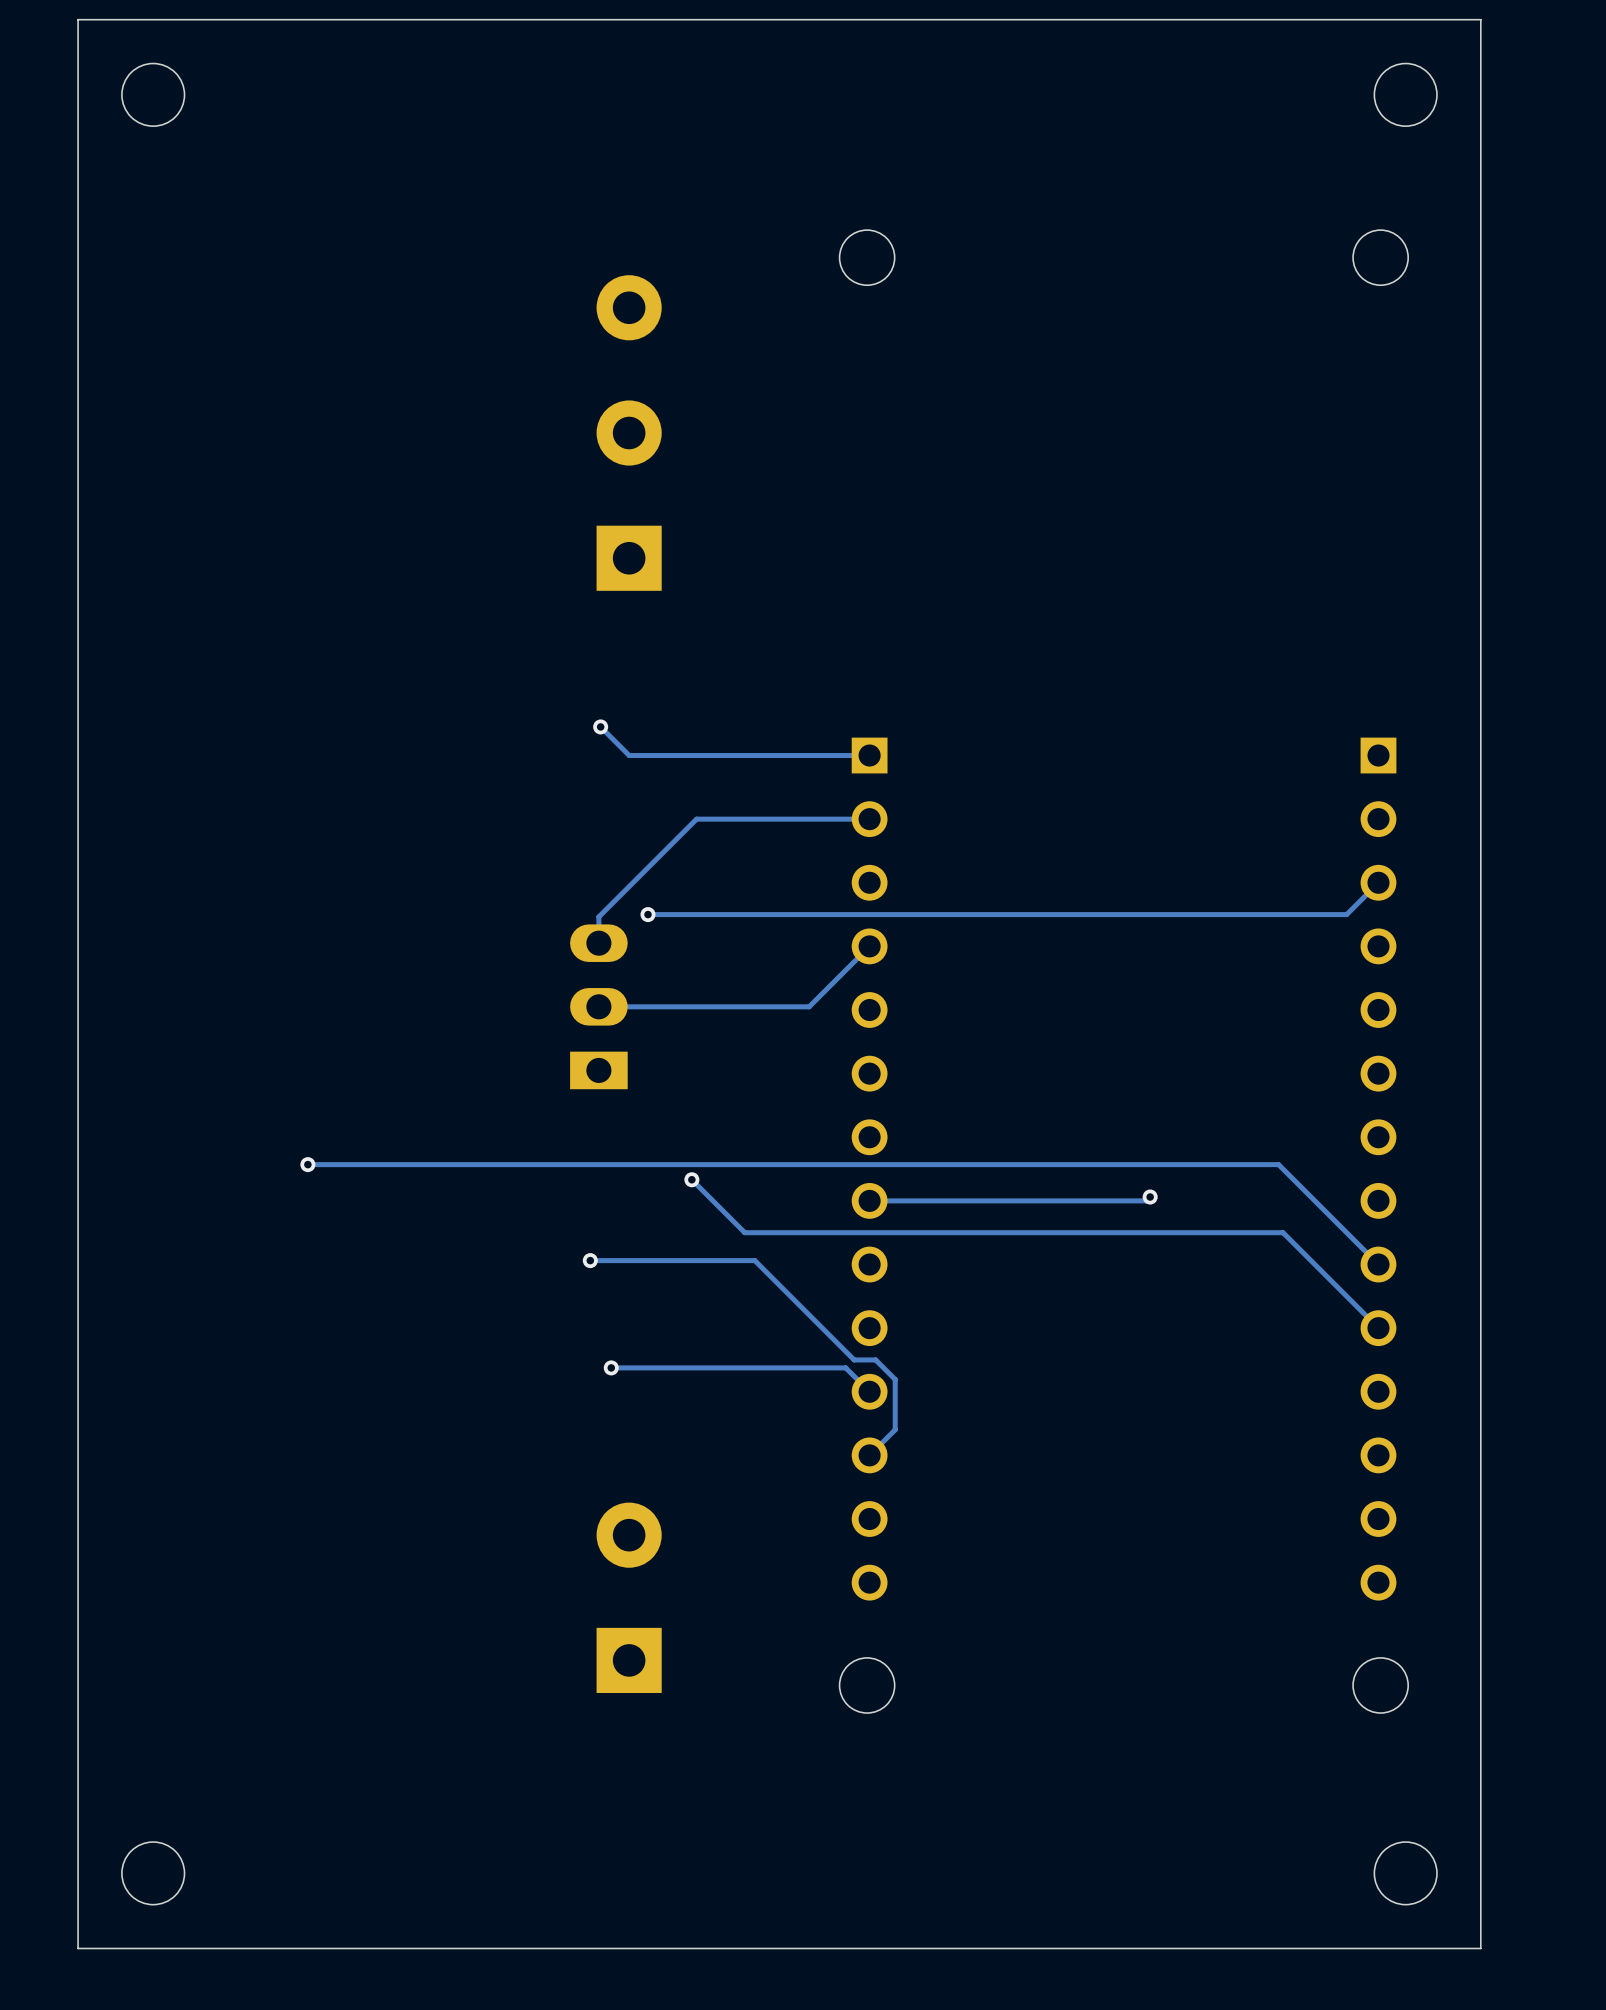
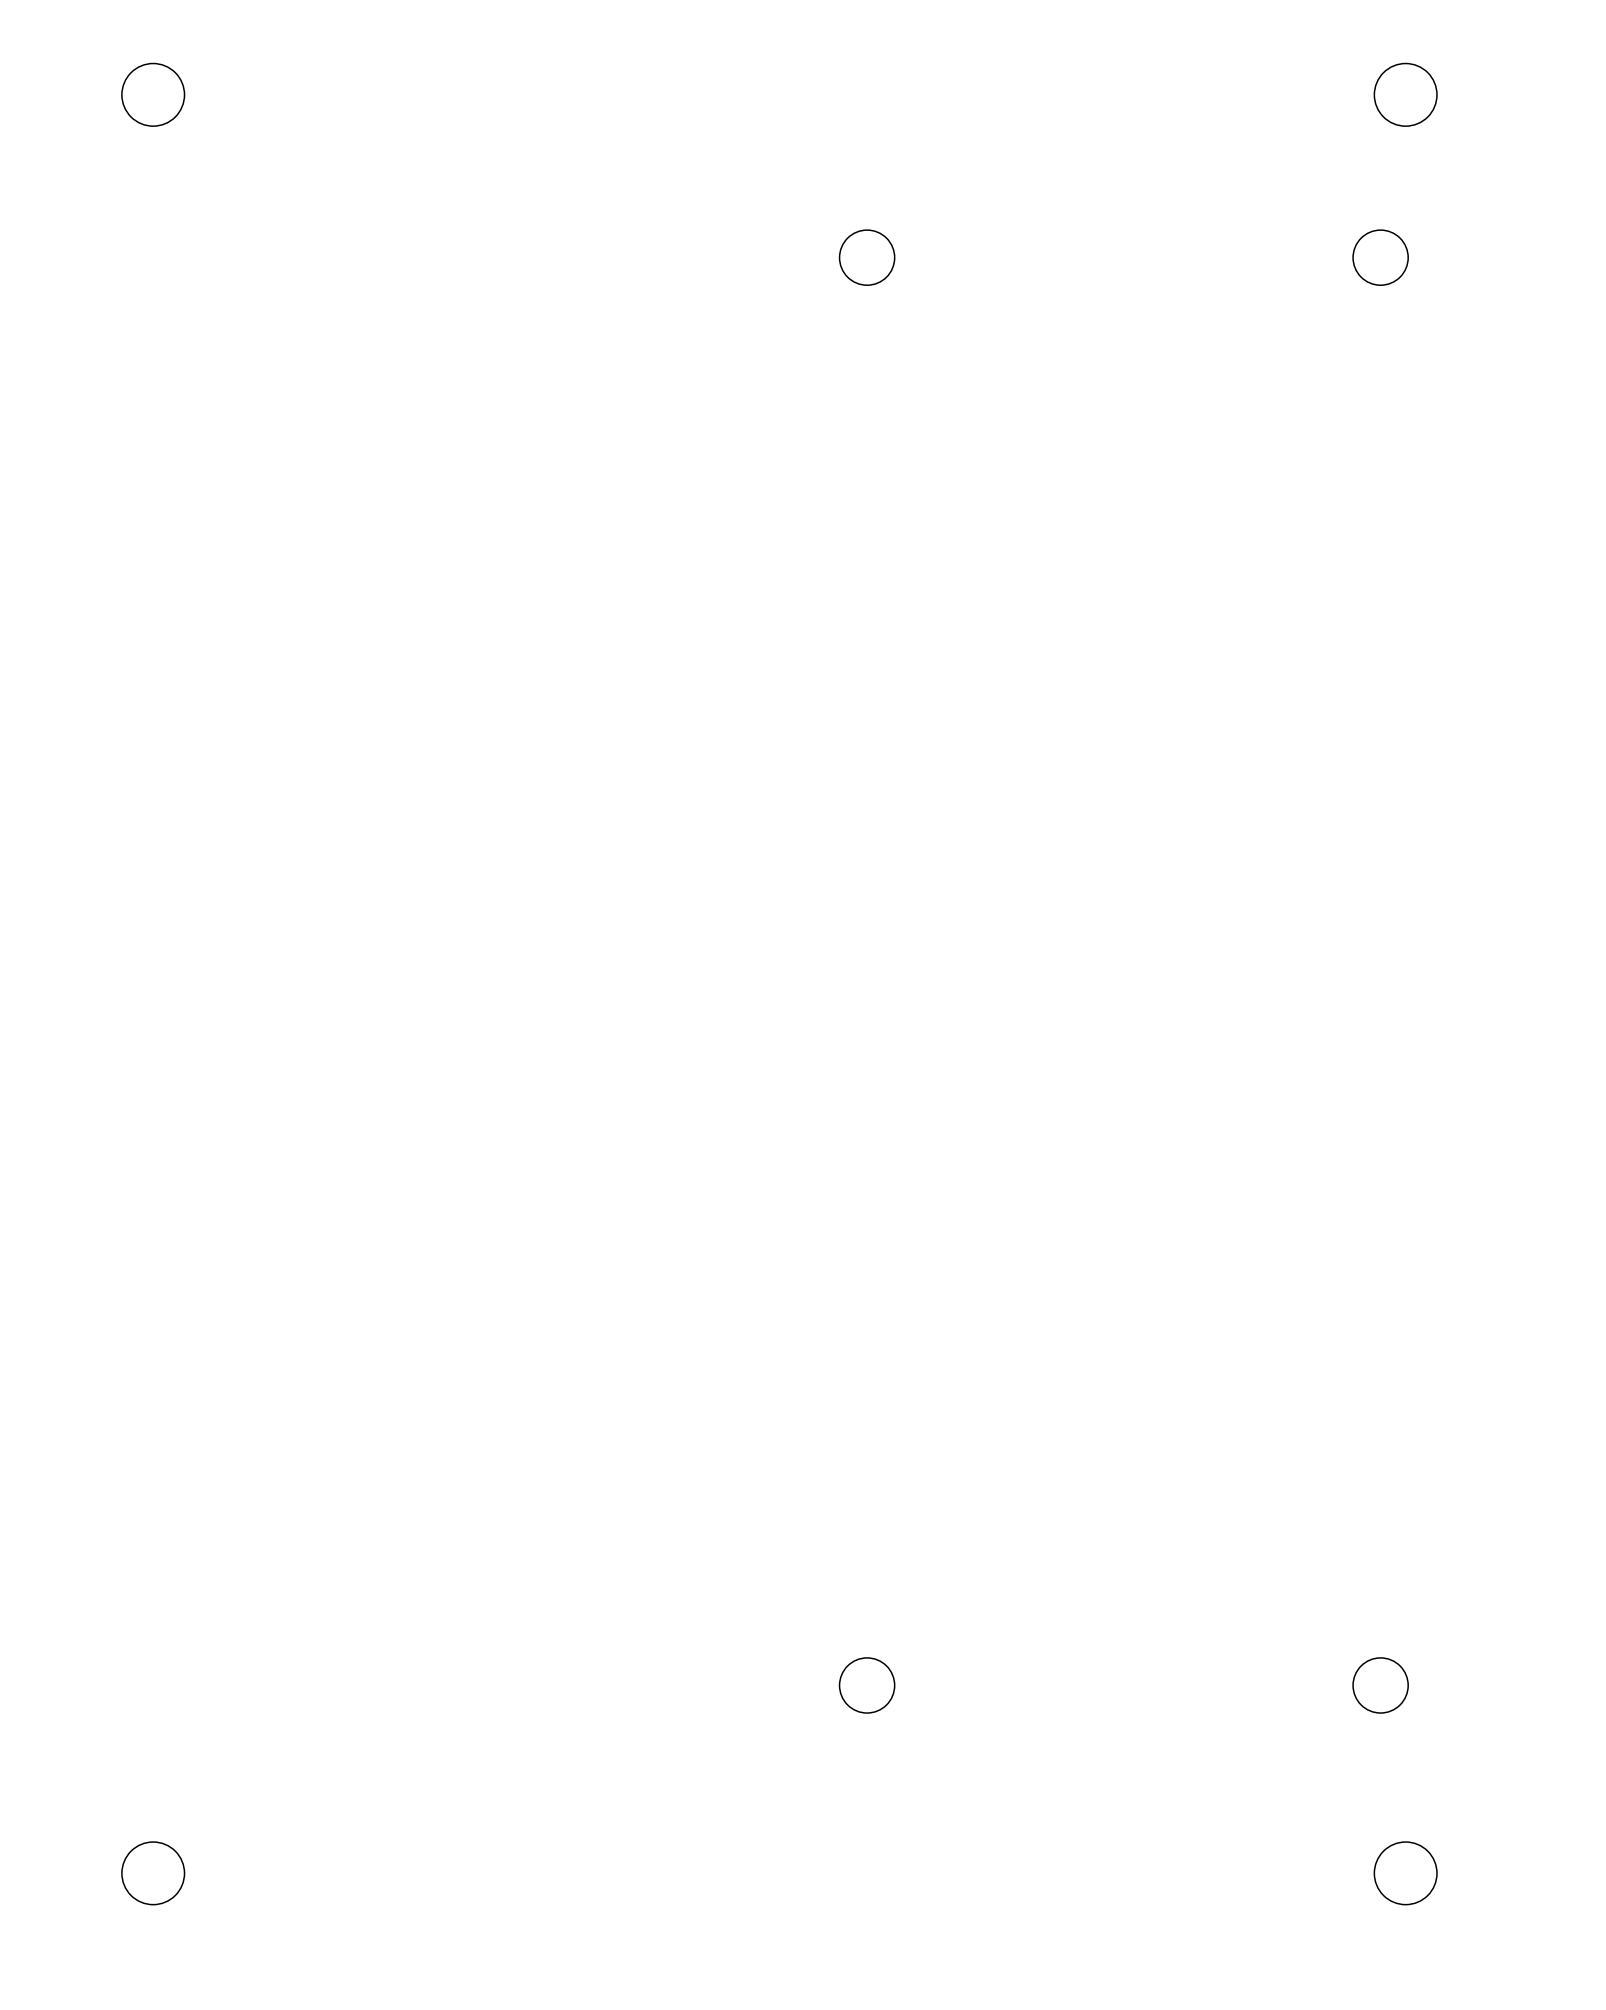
board edge: (1480, 19) (78, 19) (78, 1948) (1480, 1948) (1480, 19) -> none
part: (629, 433) -> none
track: (600, 726) (629, 755) (869, 755) -> none
via: (600, 726) -> none
track: (869, 819) (696, 819) (598, 916) (598, 943) -> none
track: (1378, 882) (1346, 914) (648, 914) -> none
via: (648, 914) -> none
track: (869, 946) (809, 1006) (598, 1006) -> none
part: (598, 1006) -> none
track: (307, 1164) (1278, 1164) (1378, 1264) -> none
via: (307, 1164) -> none
part: (869, 1169) -> none
part: (1378, 1169) -> none
track: (691, 1179) (744, 1232) (1283, 1232) (1378, 1328) -> none
via: (691, 1179) -> none
track: (1150, 1197) (1146, 1200) (869, 1200) -> none
via: (1150, 1197) -> none
track: (590, 1260) (754, 1260) (854, 1359) (875, 1359) (895, 1379) (895, 1429) (869, 1455) -> none
via: (590, 1260) -> none
track: (611, 1367) (845, 1367) (869, 1391) -> none
via: (611, 1367) -> none
part: (629, 1597) -> none

